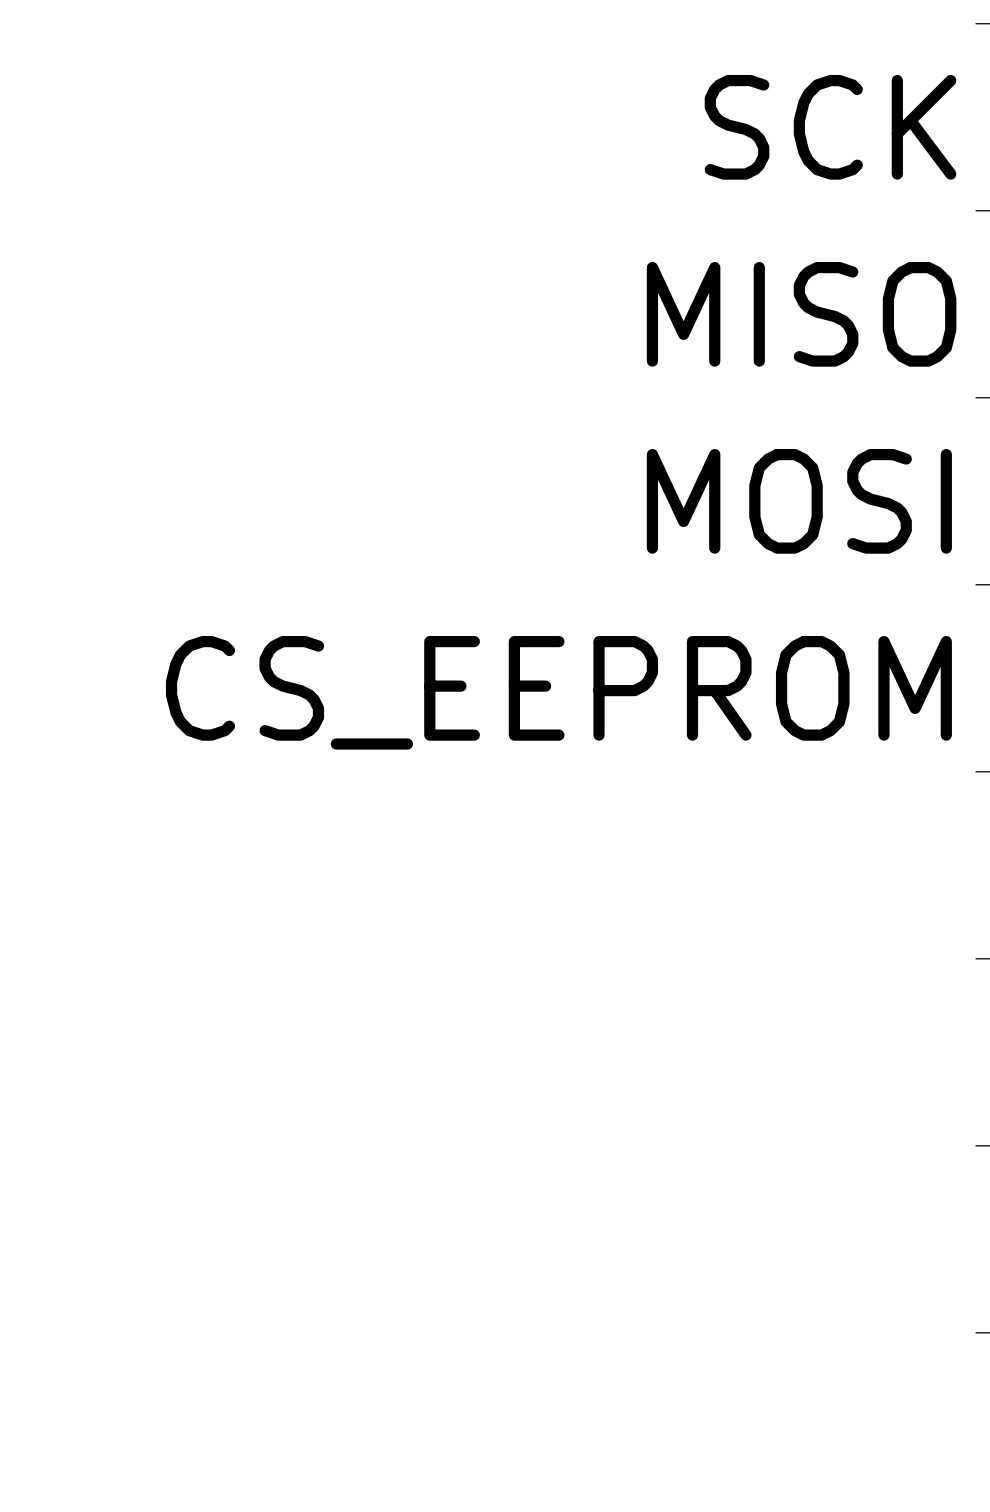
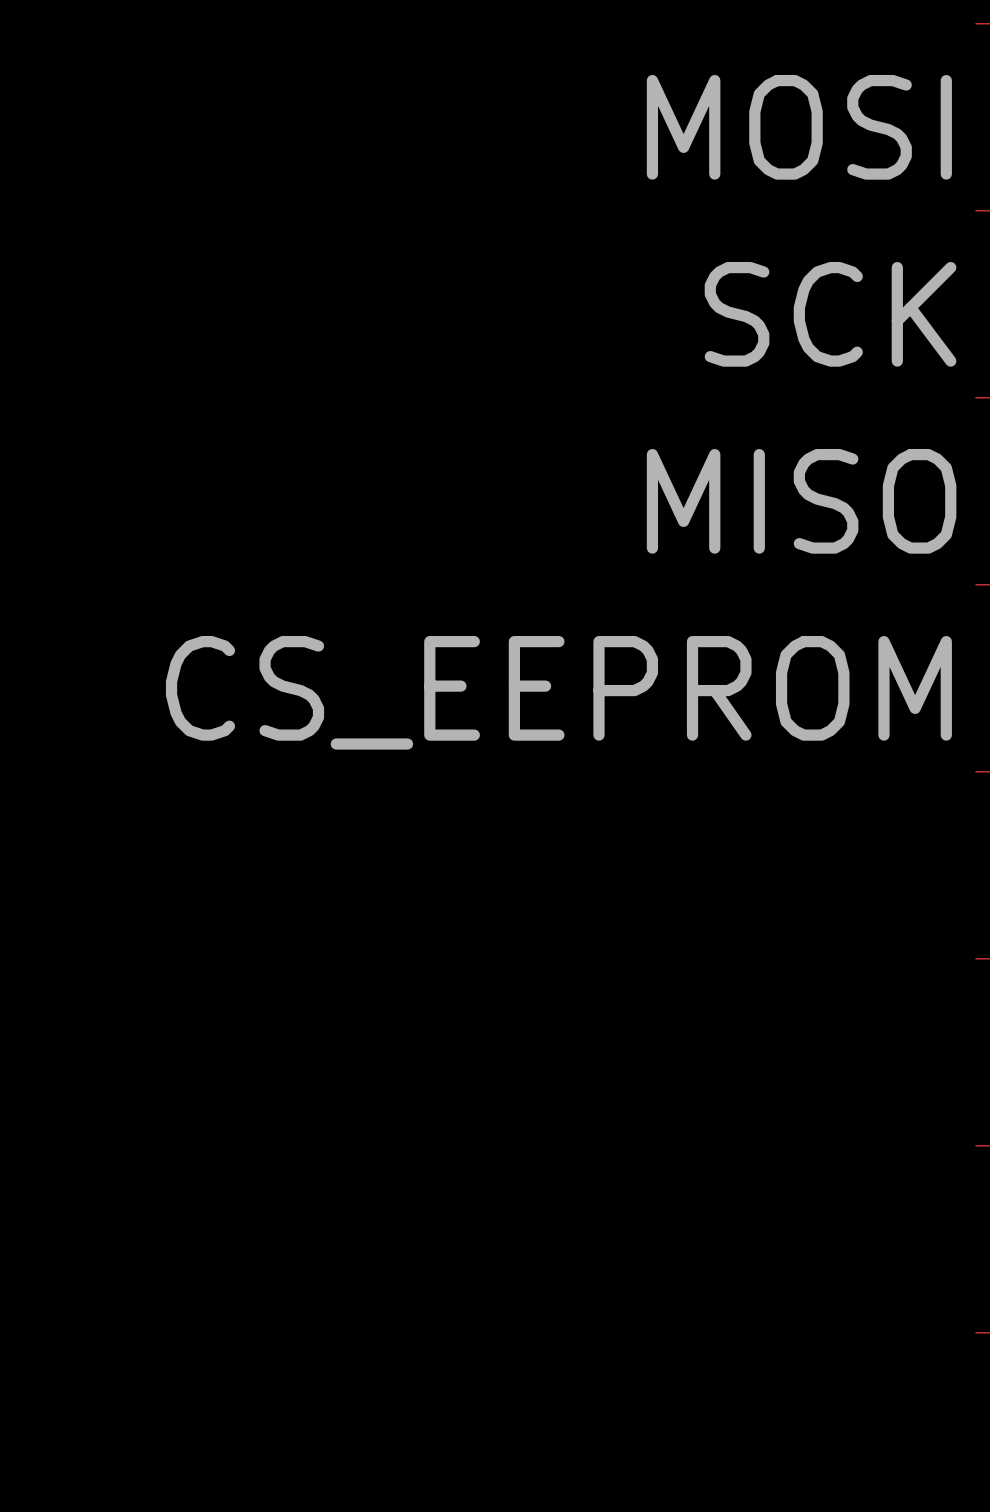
label: SCK (830, 127) -> MOSI (799, 127)
label: MISO (801, 314) -> SCK (830, 314)
label: MOSI (799, 501) -> MISO (801, 501)

